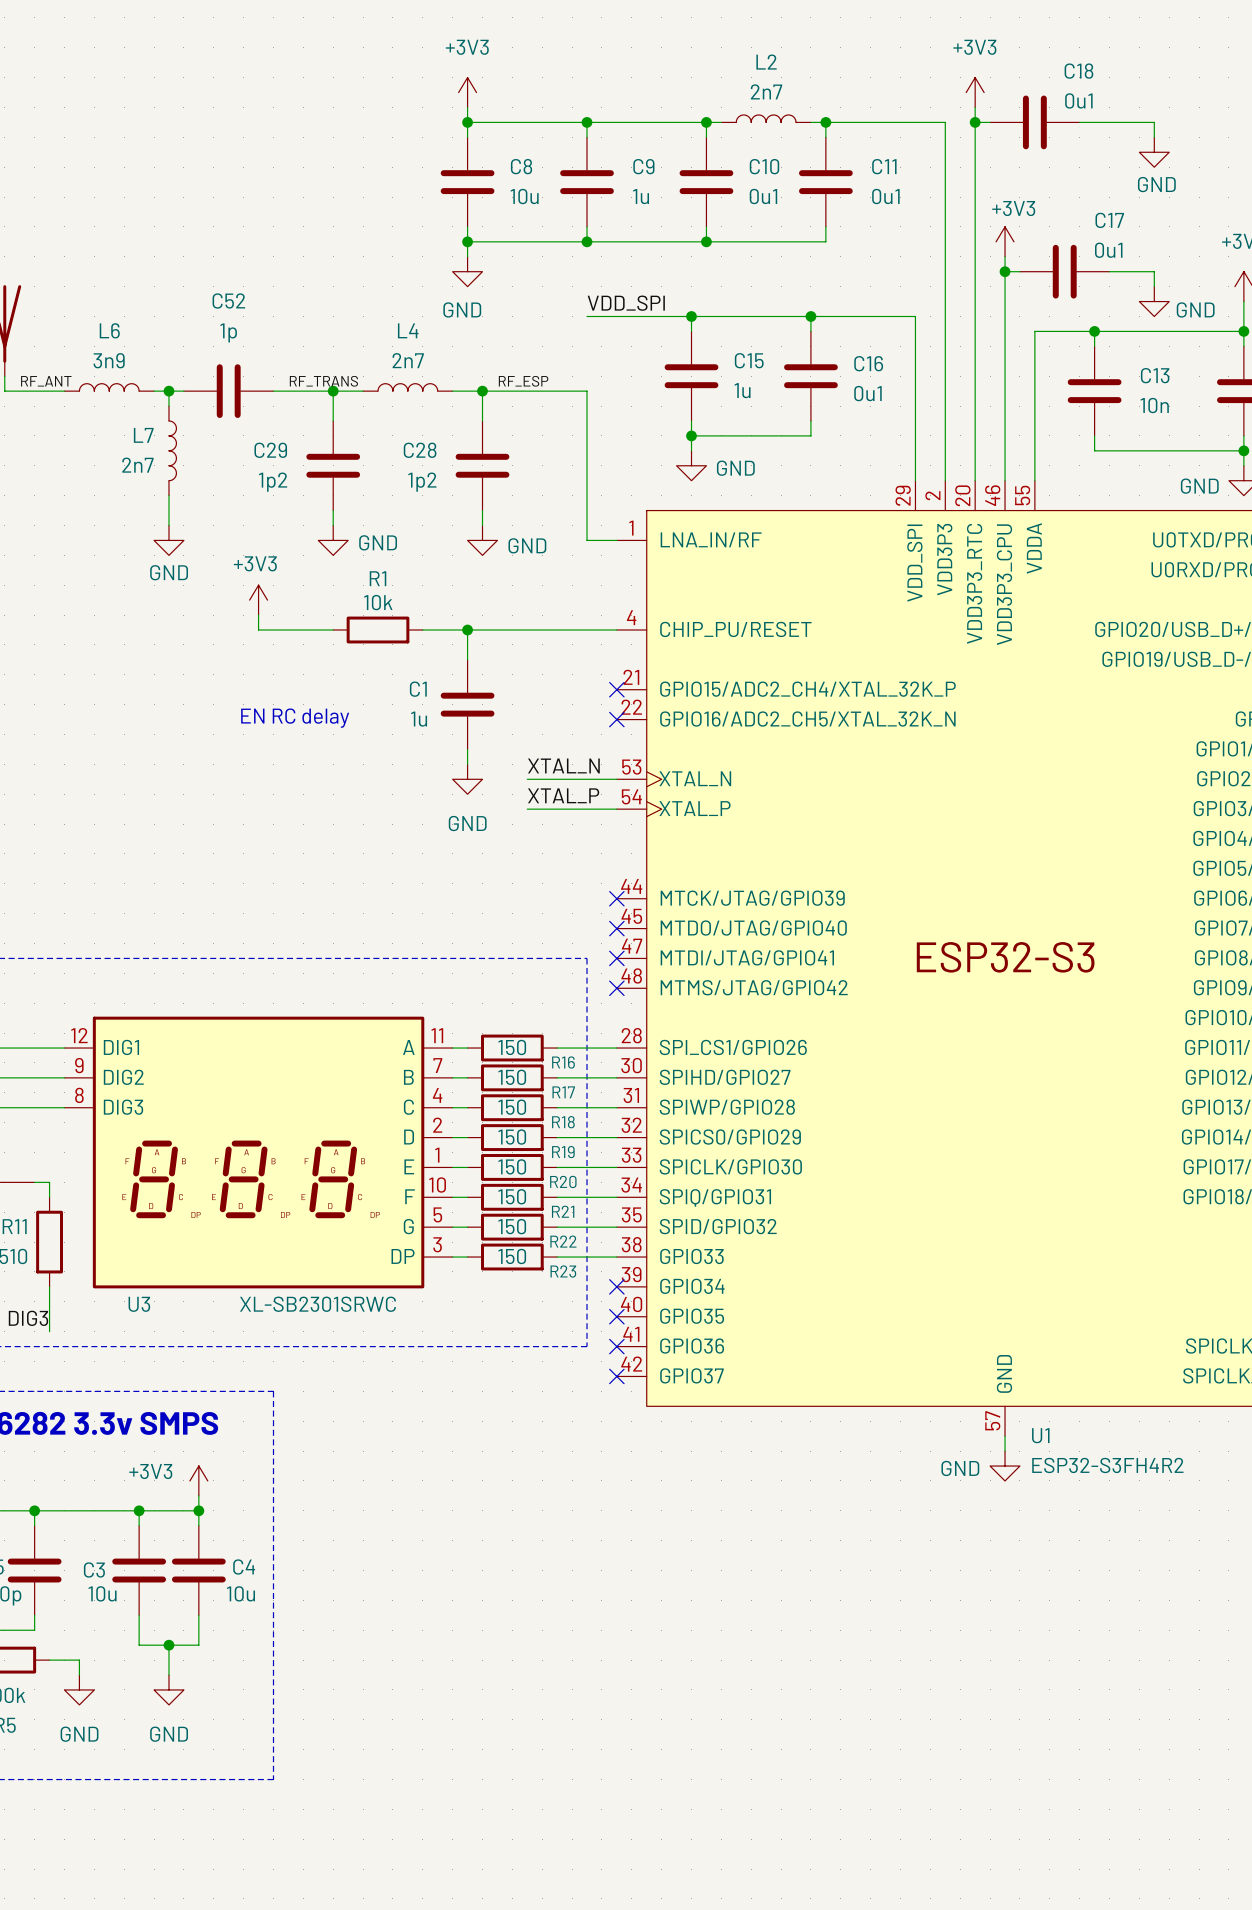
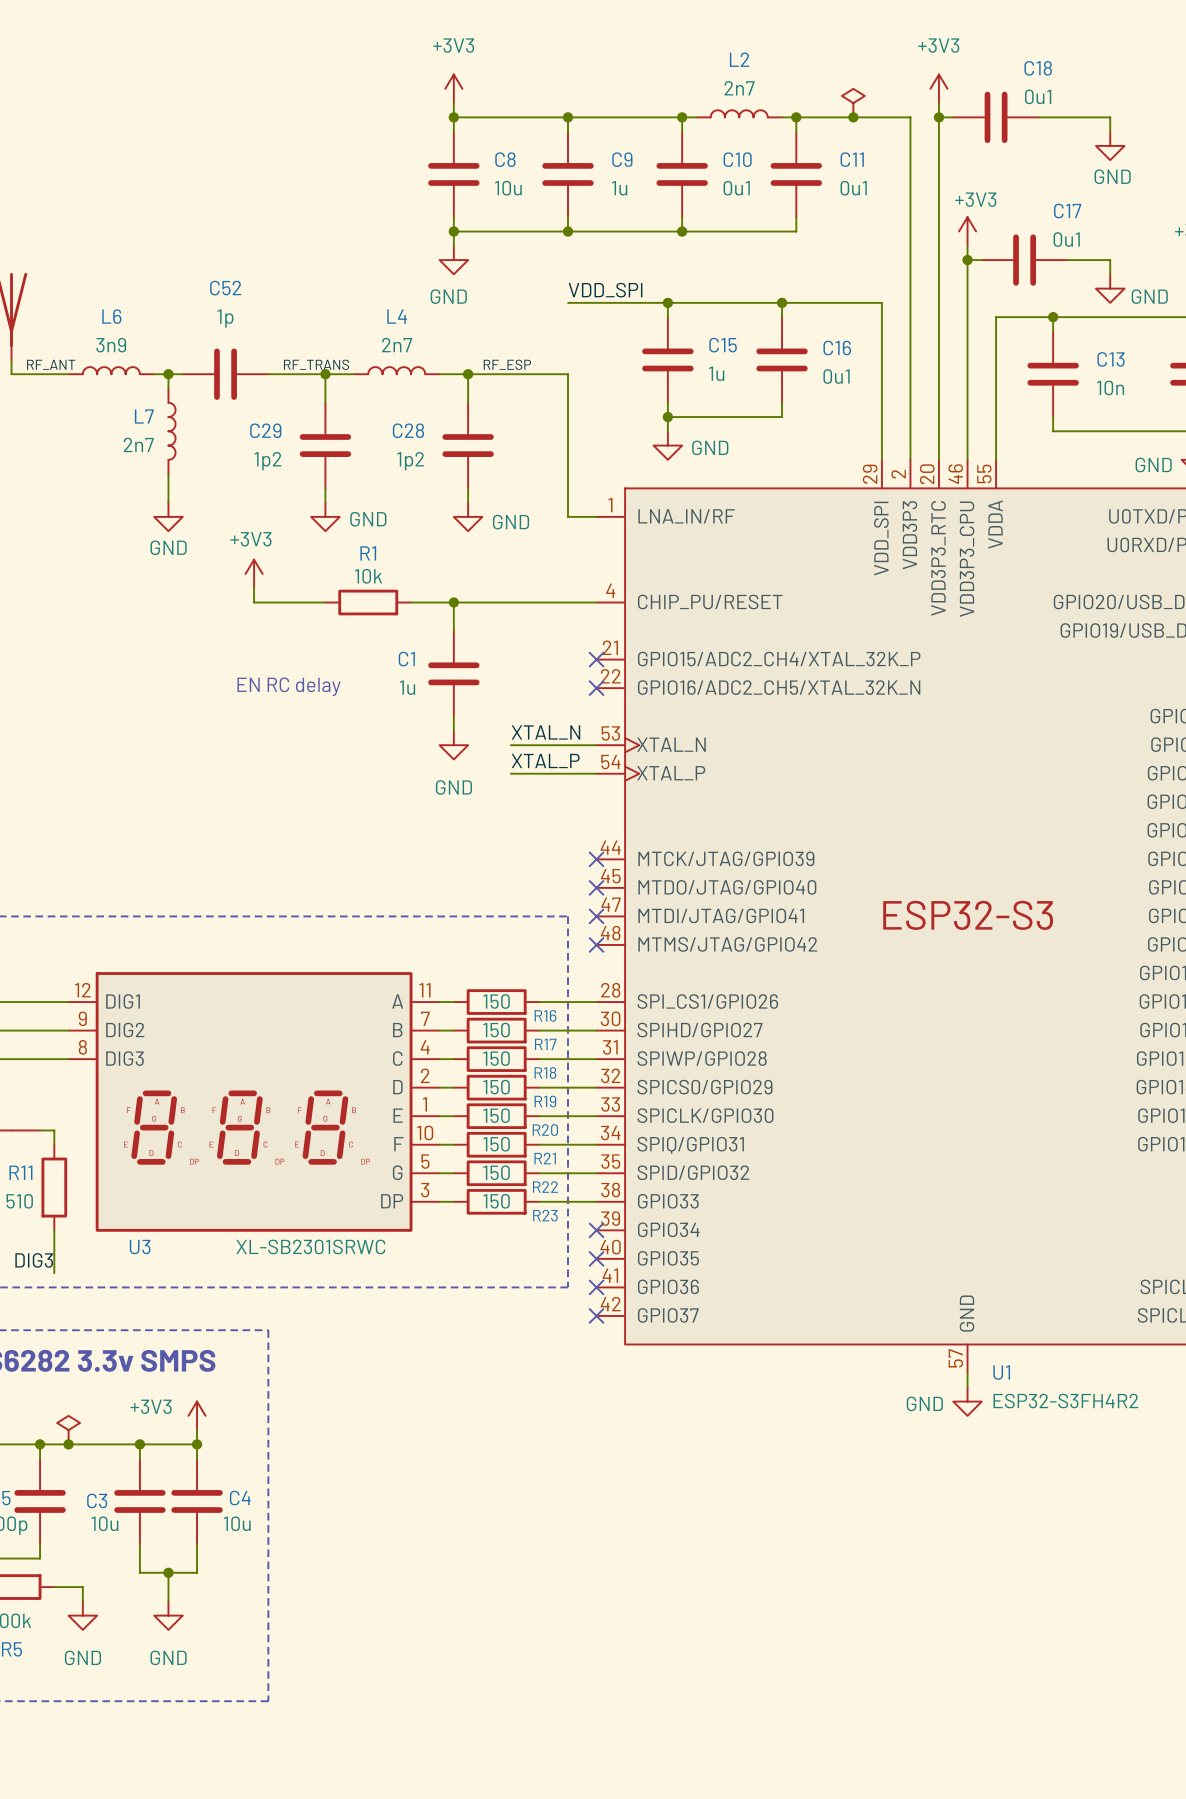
power symbol: none -> (853, 103)
junction: none -> (853, 117)
power symbol: none -> (68, 1430)
junction: none -> (68, 1444)

